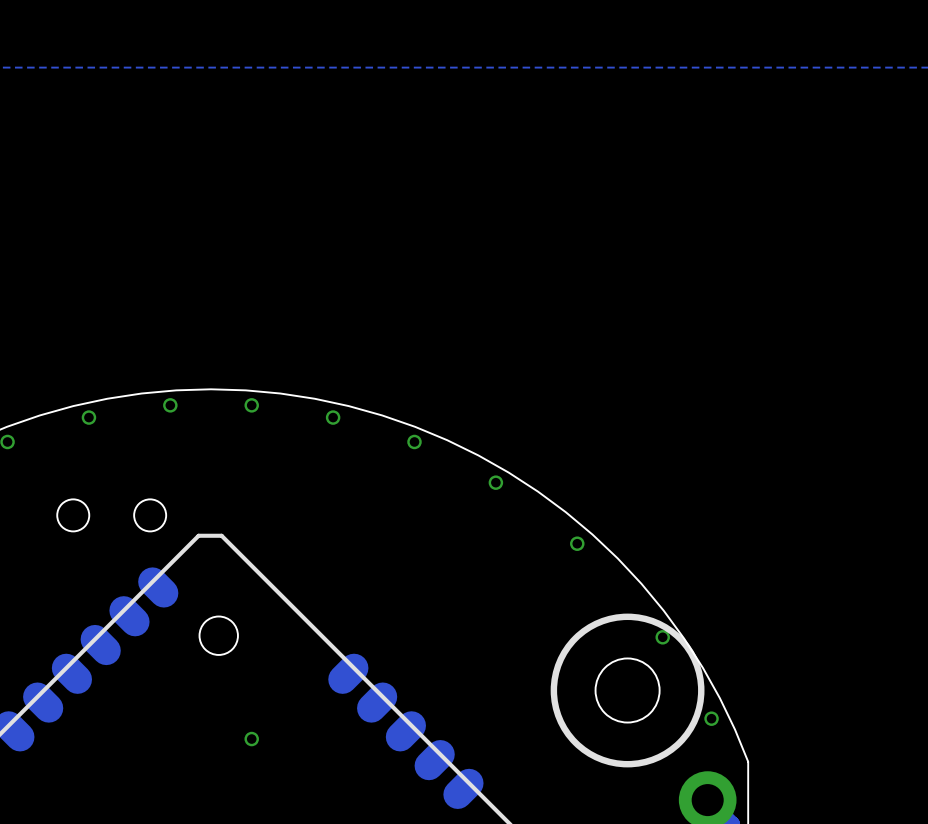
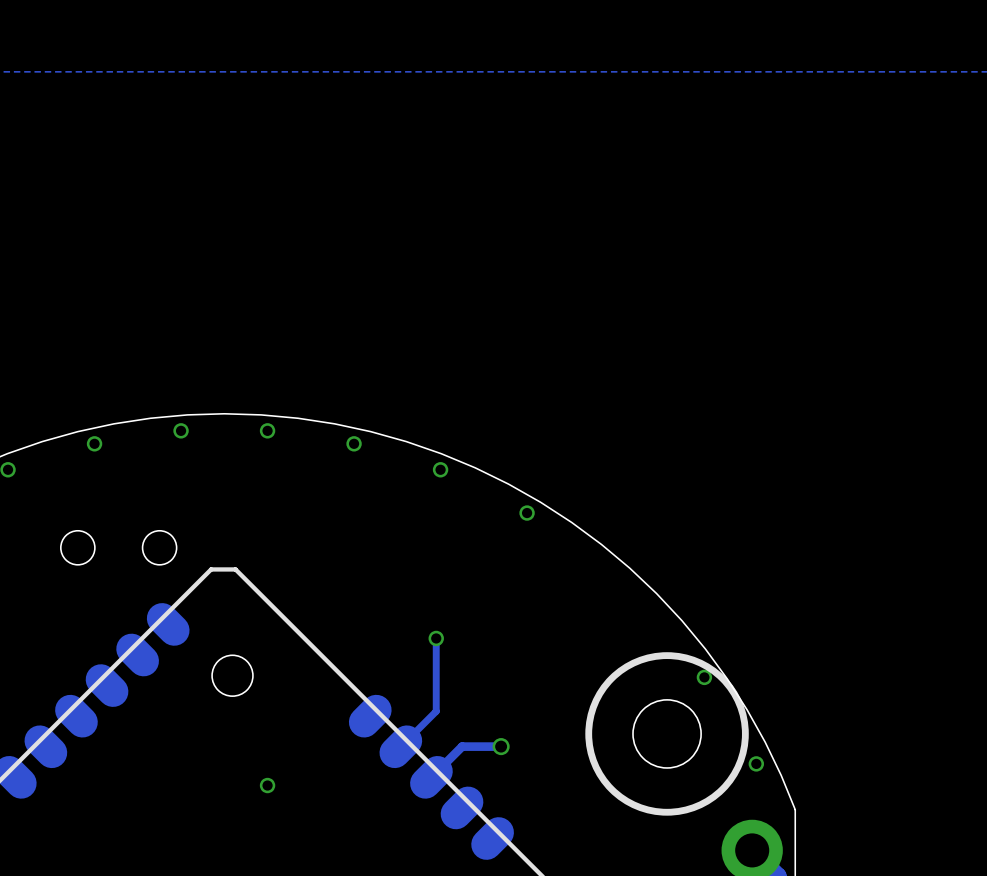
via position: (577, 543) -> (436, 638)
track: none -> (436, 638) (436, 711) (400, 746)
track: none -> (501, 746) (462, 746) (431, 777)
via: none -> (501, 746)

